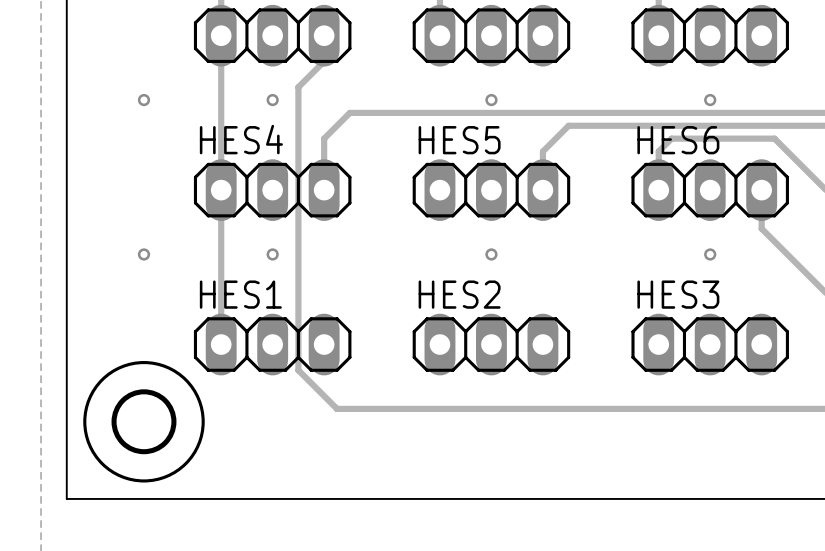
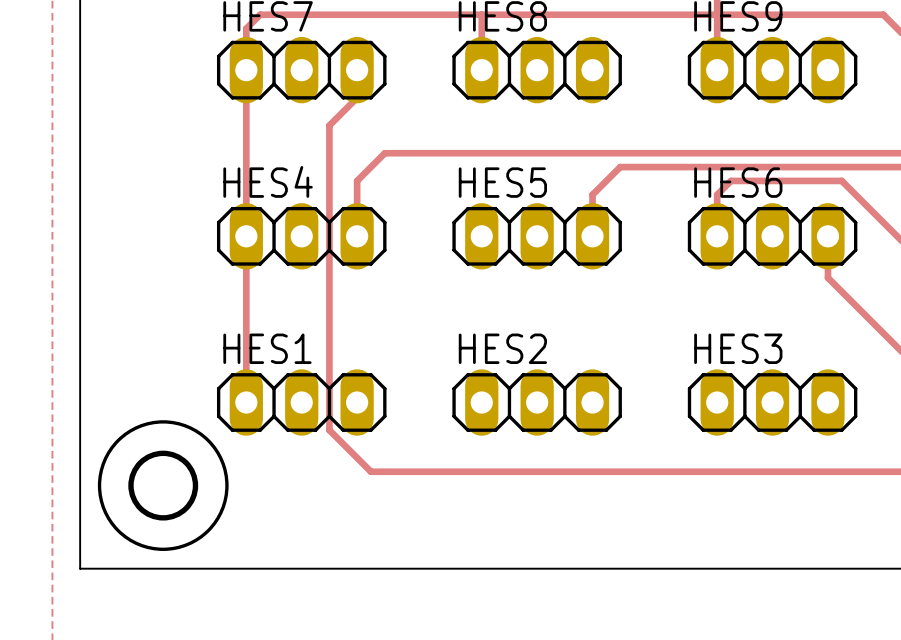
via: (143, 100) -> none
via: (272, 100) -> none
via: (491, 100) -> none
via: (710, 100) -> none
via: (143, 254) -> none
via: (272, 254) -> none
via: (491, 254) -> none
via: (710, 254) -> none

